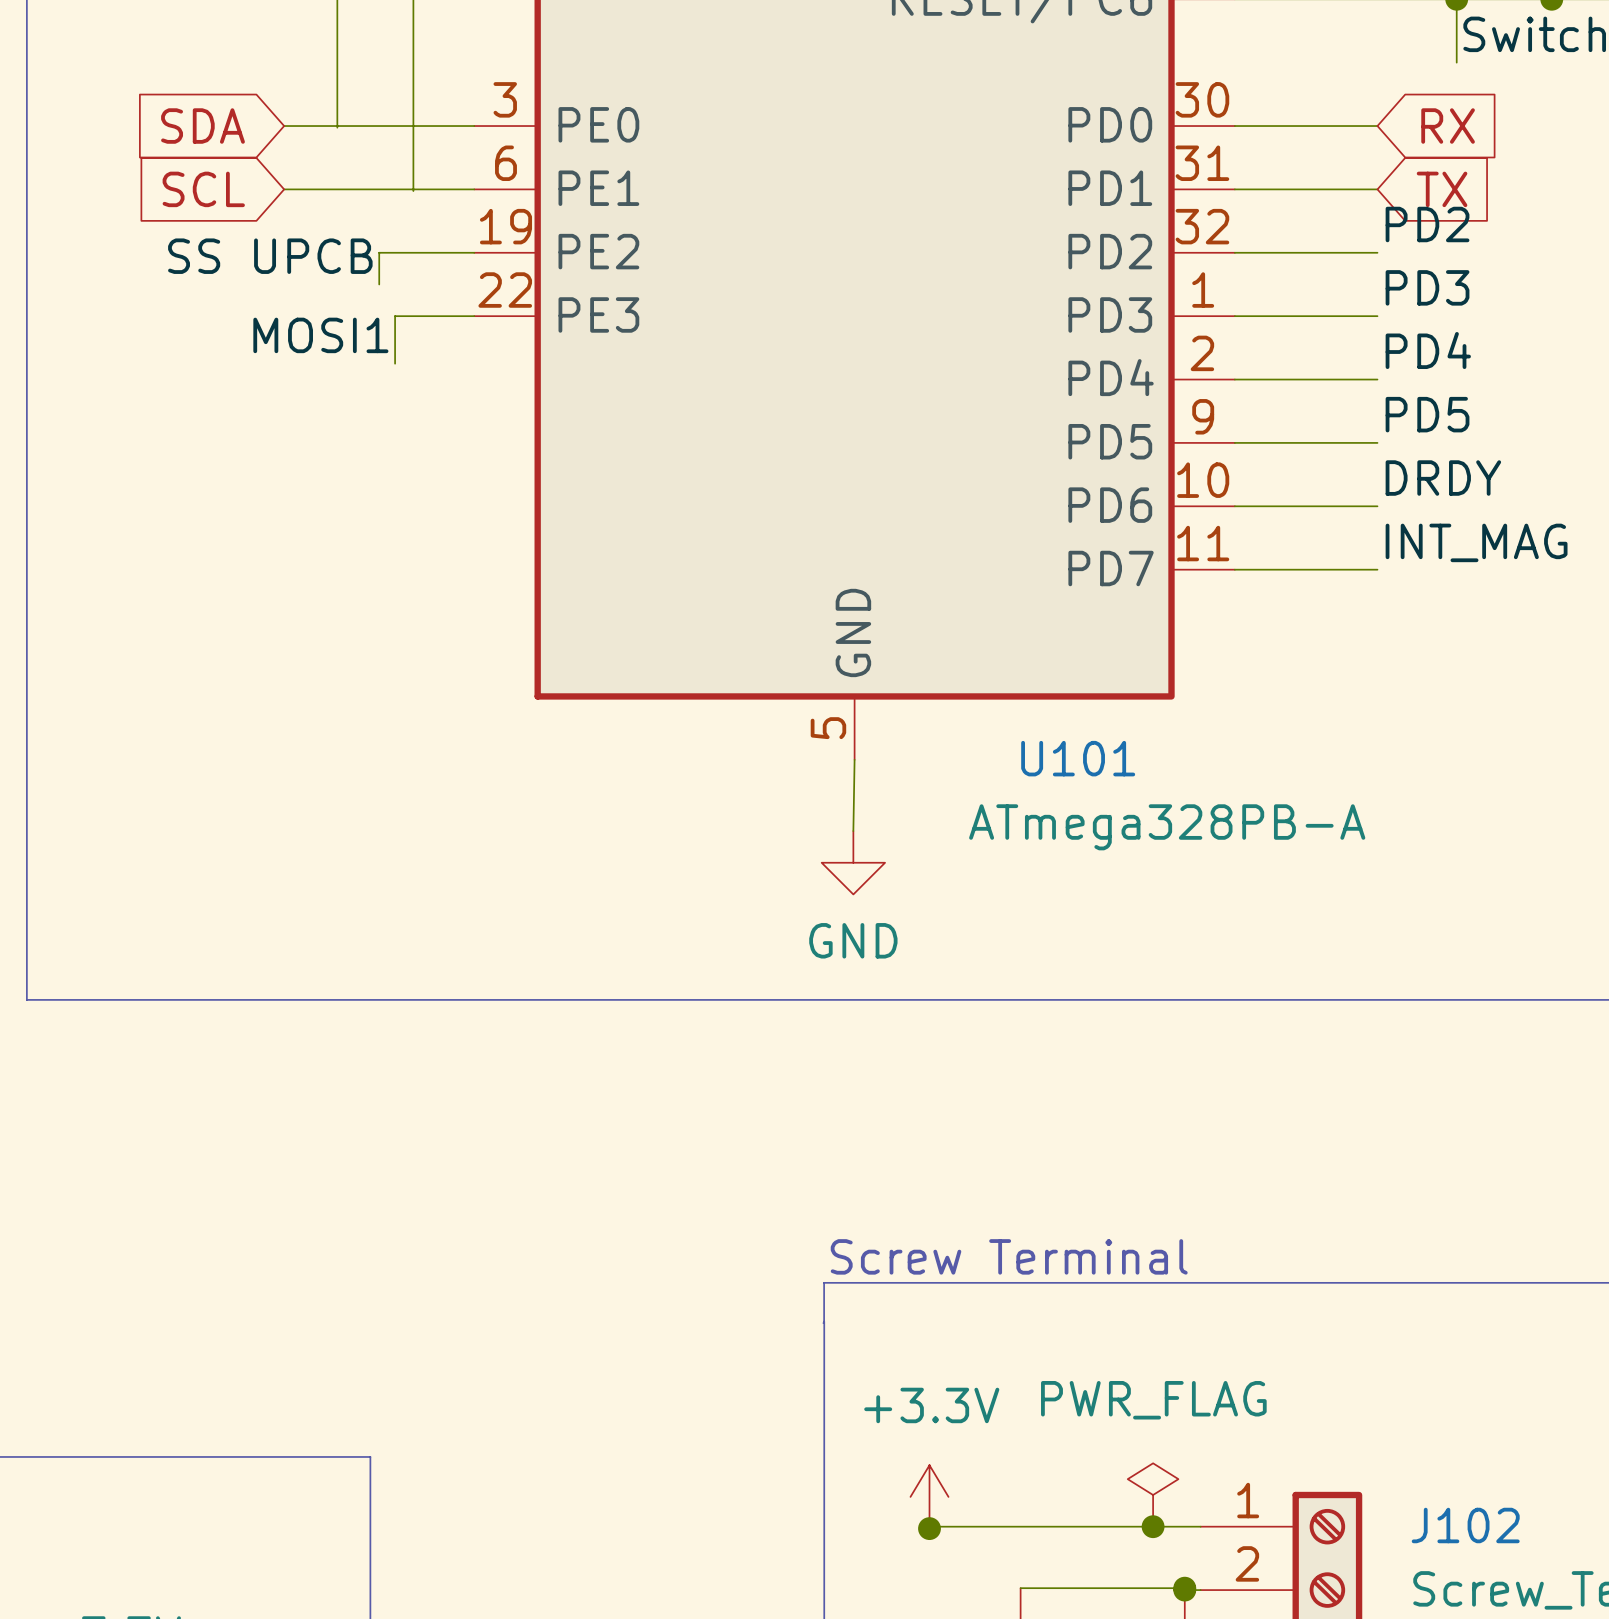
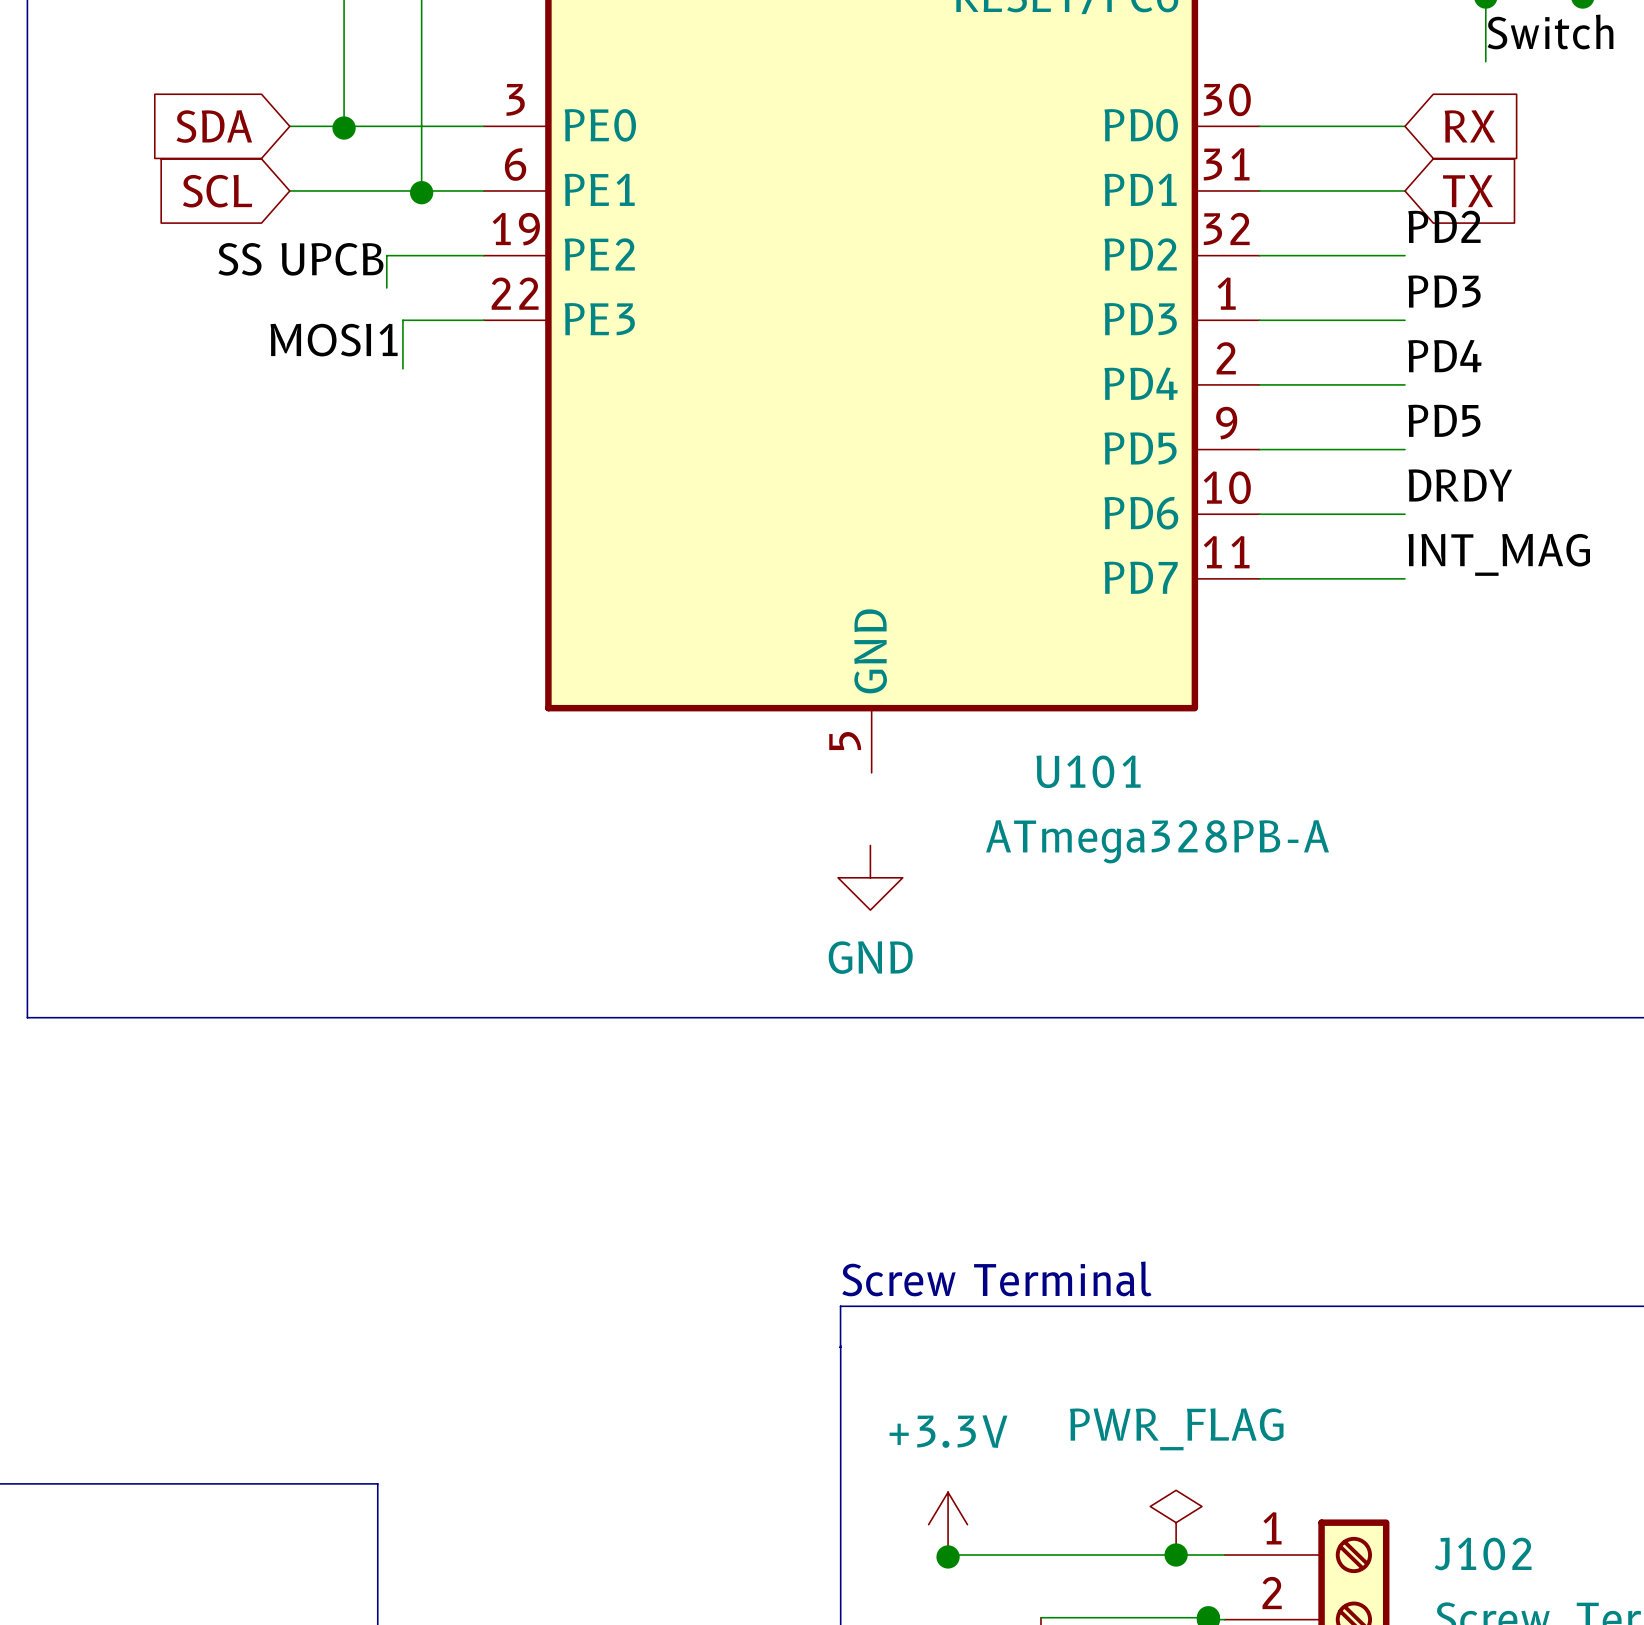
junction: none -> (344, 128)
junction: none -> (421, 192)
wire: (854, 759) (853, 831) -> none

